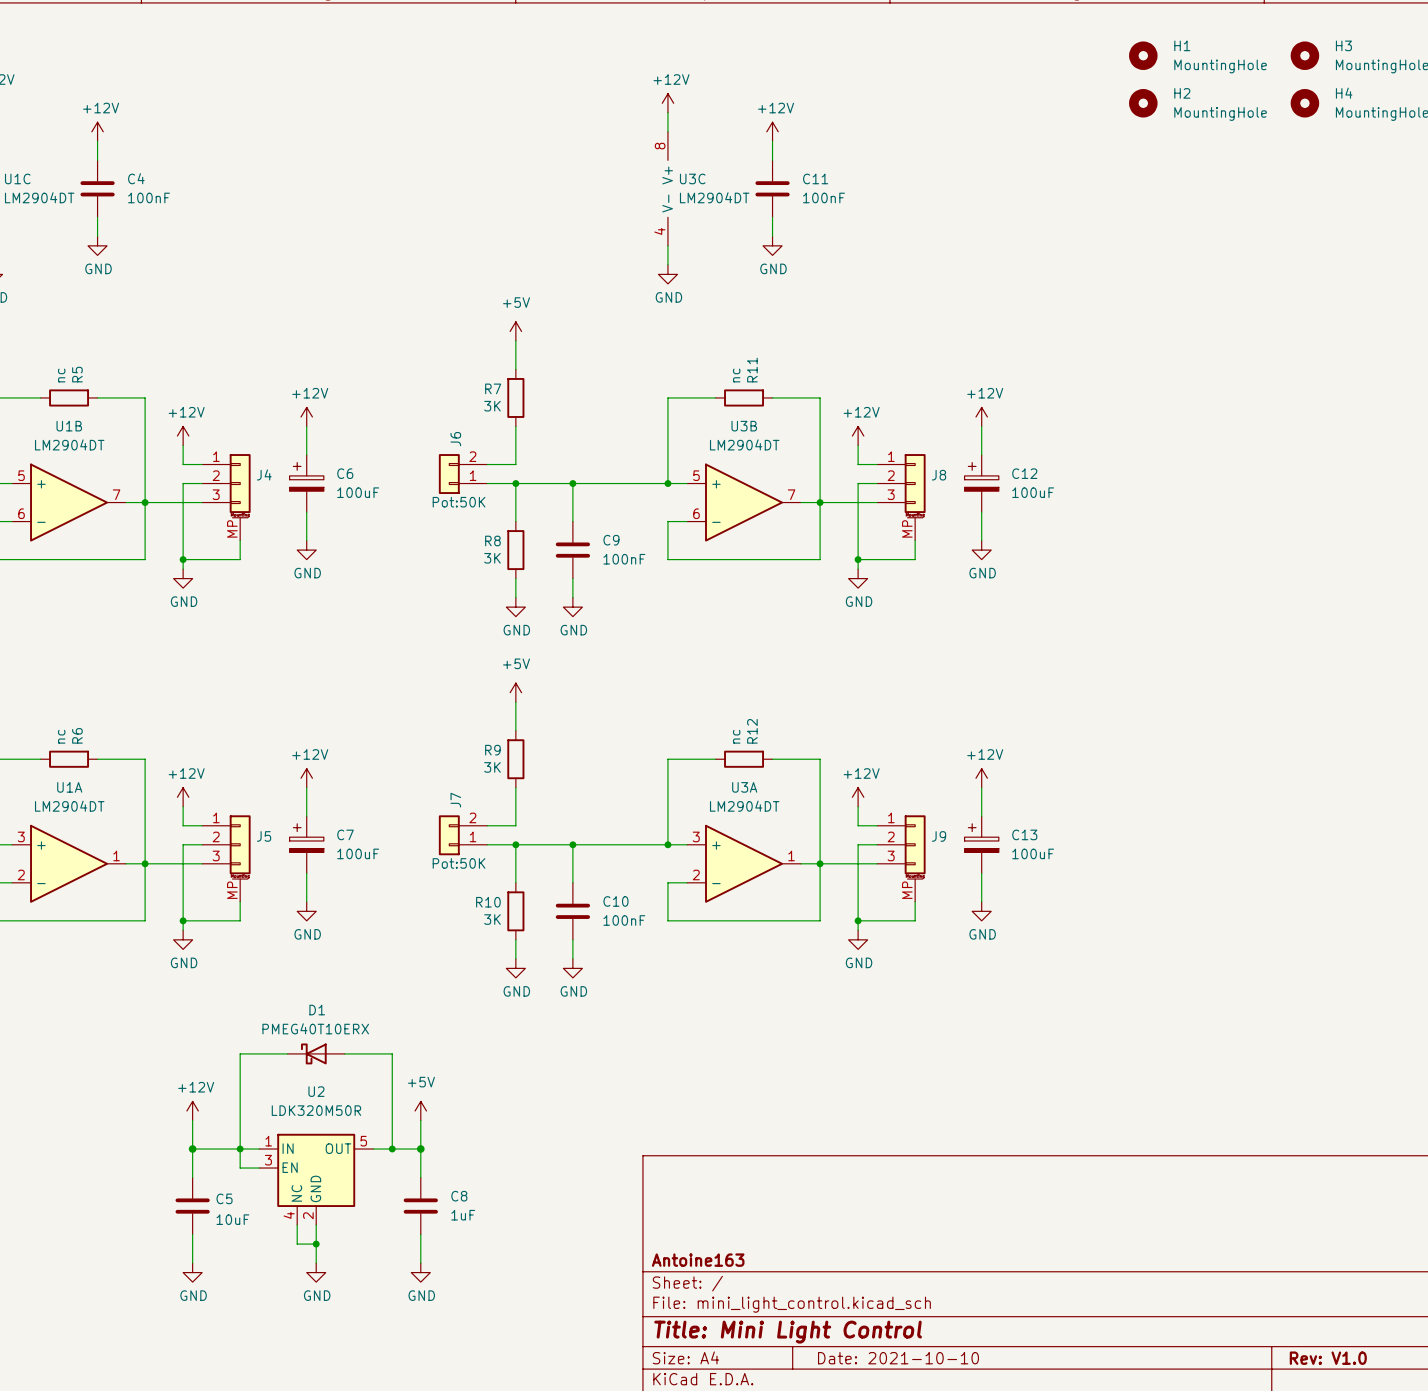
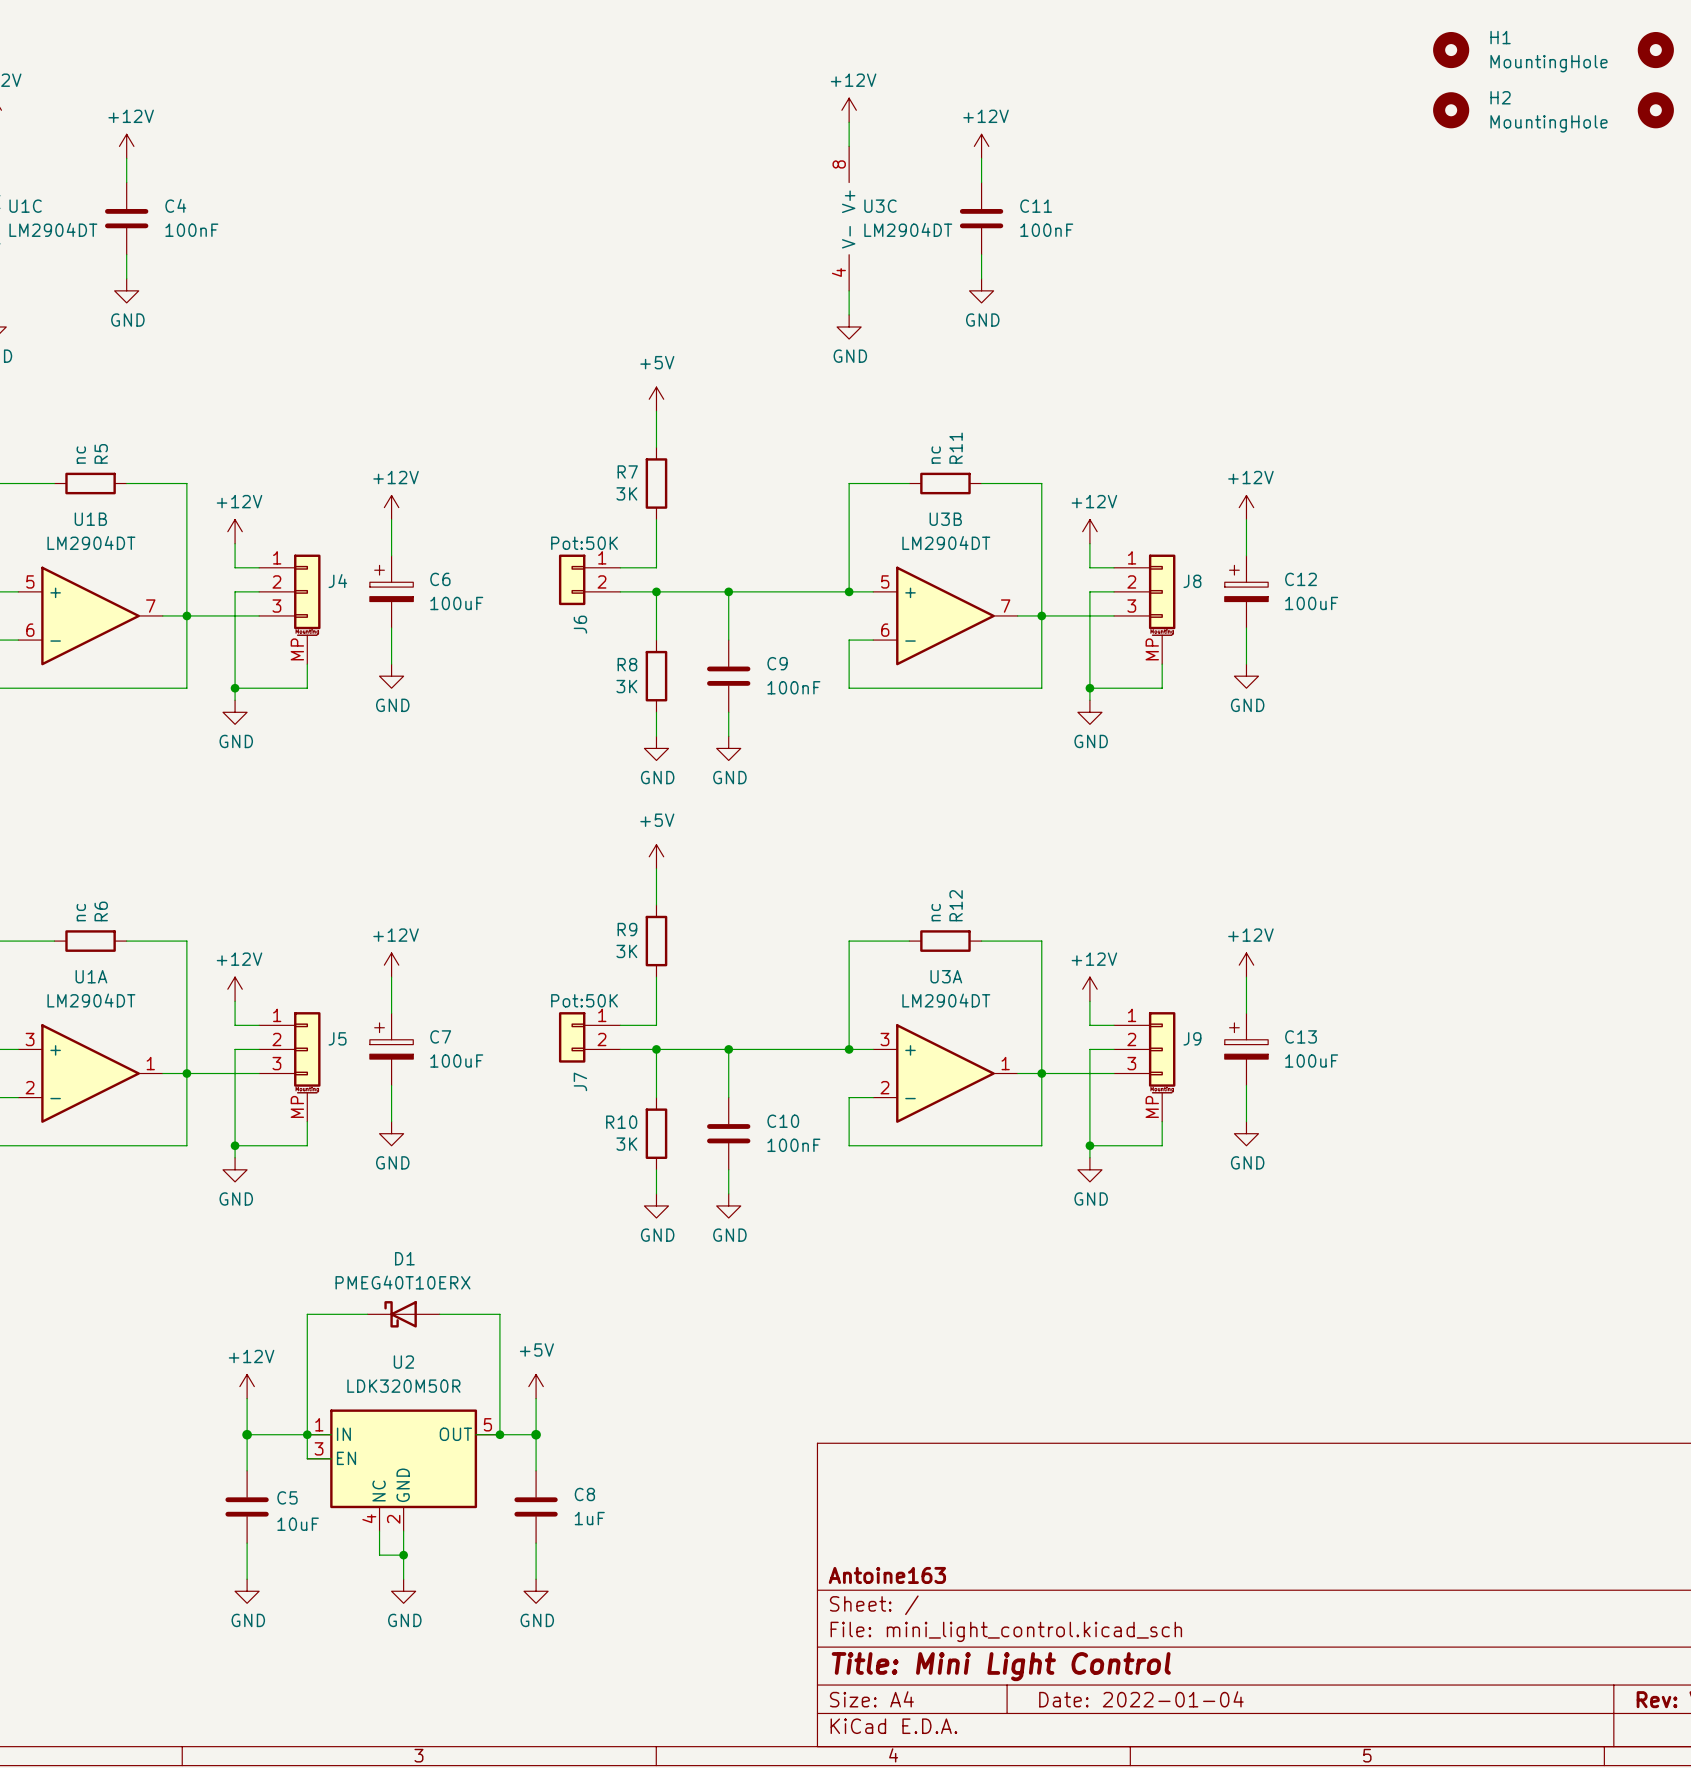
J6 flip: as is (449, 474) -> up-down (572, 579)
J7 flip: as is (449, 835) -> up-down (572, 1037)
U2 symbol: [259, 1133, 374, 1226] -> [307, 1409, 500, 1532]
title block: Date: 2021-10-10 (898, 1358) -> Date: 2022-01-04 (1141, 1699)

